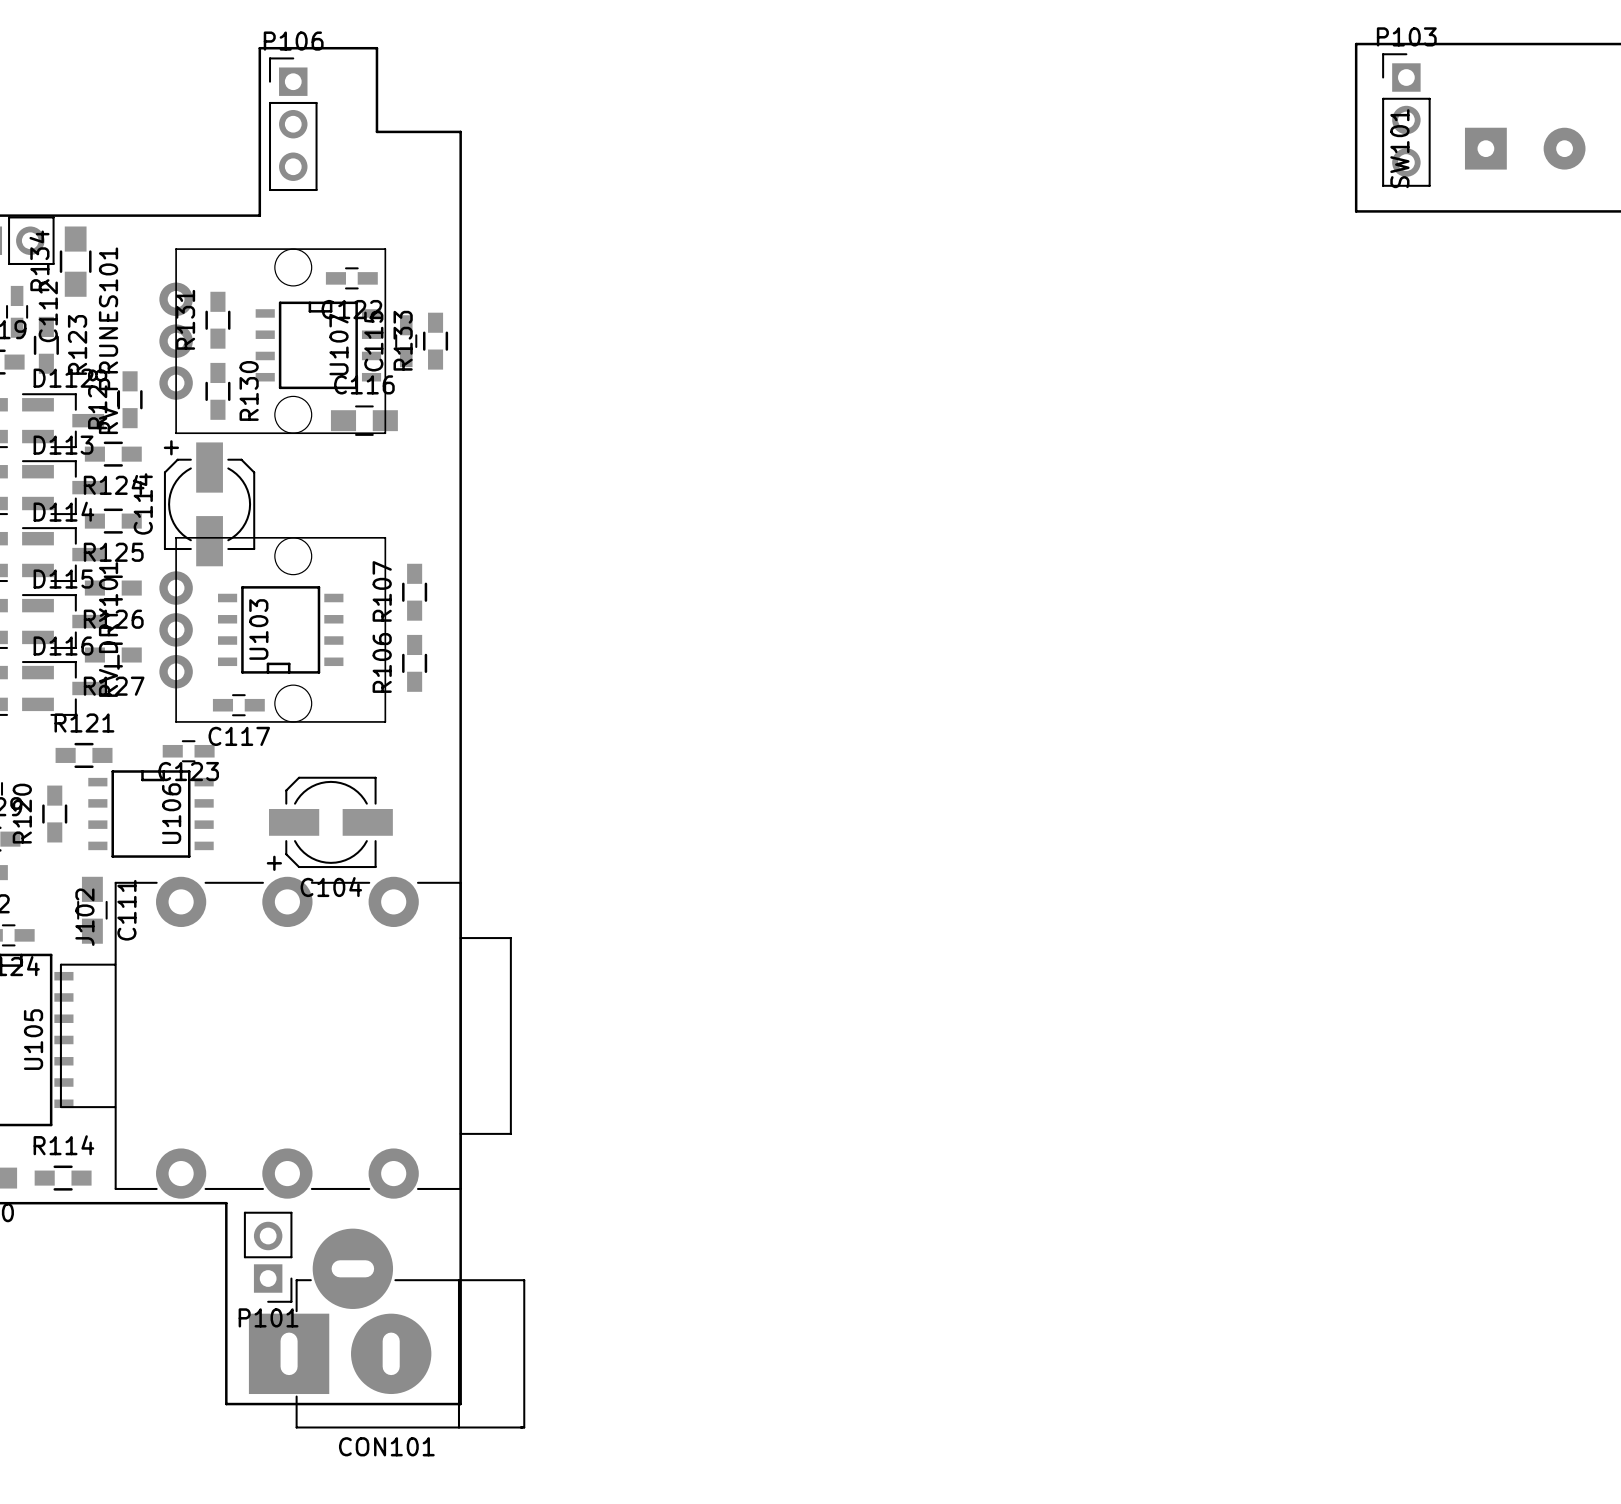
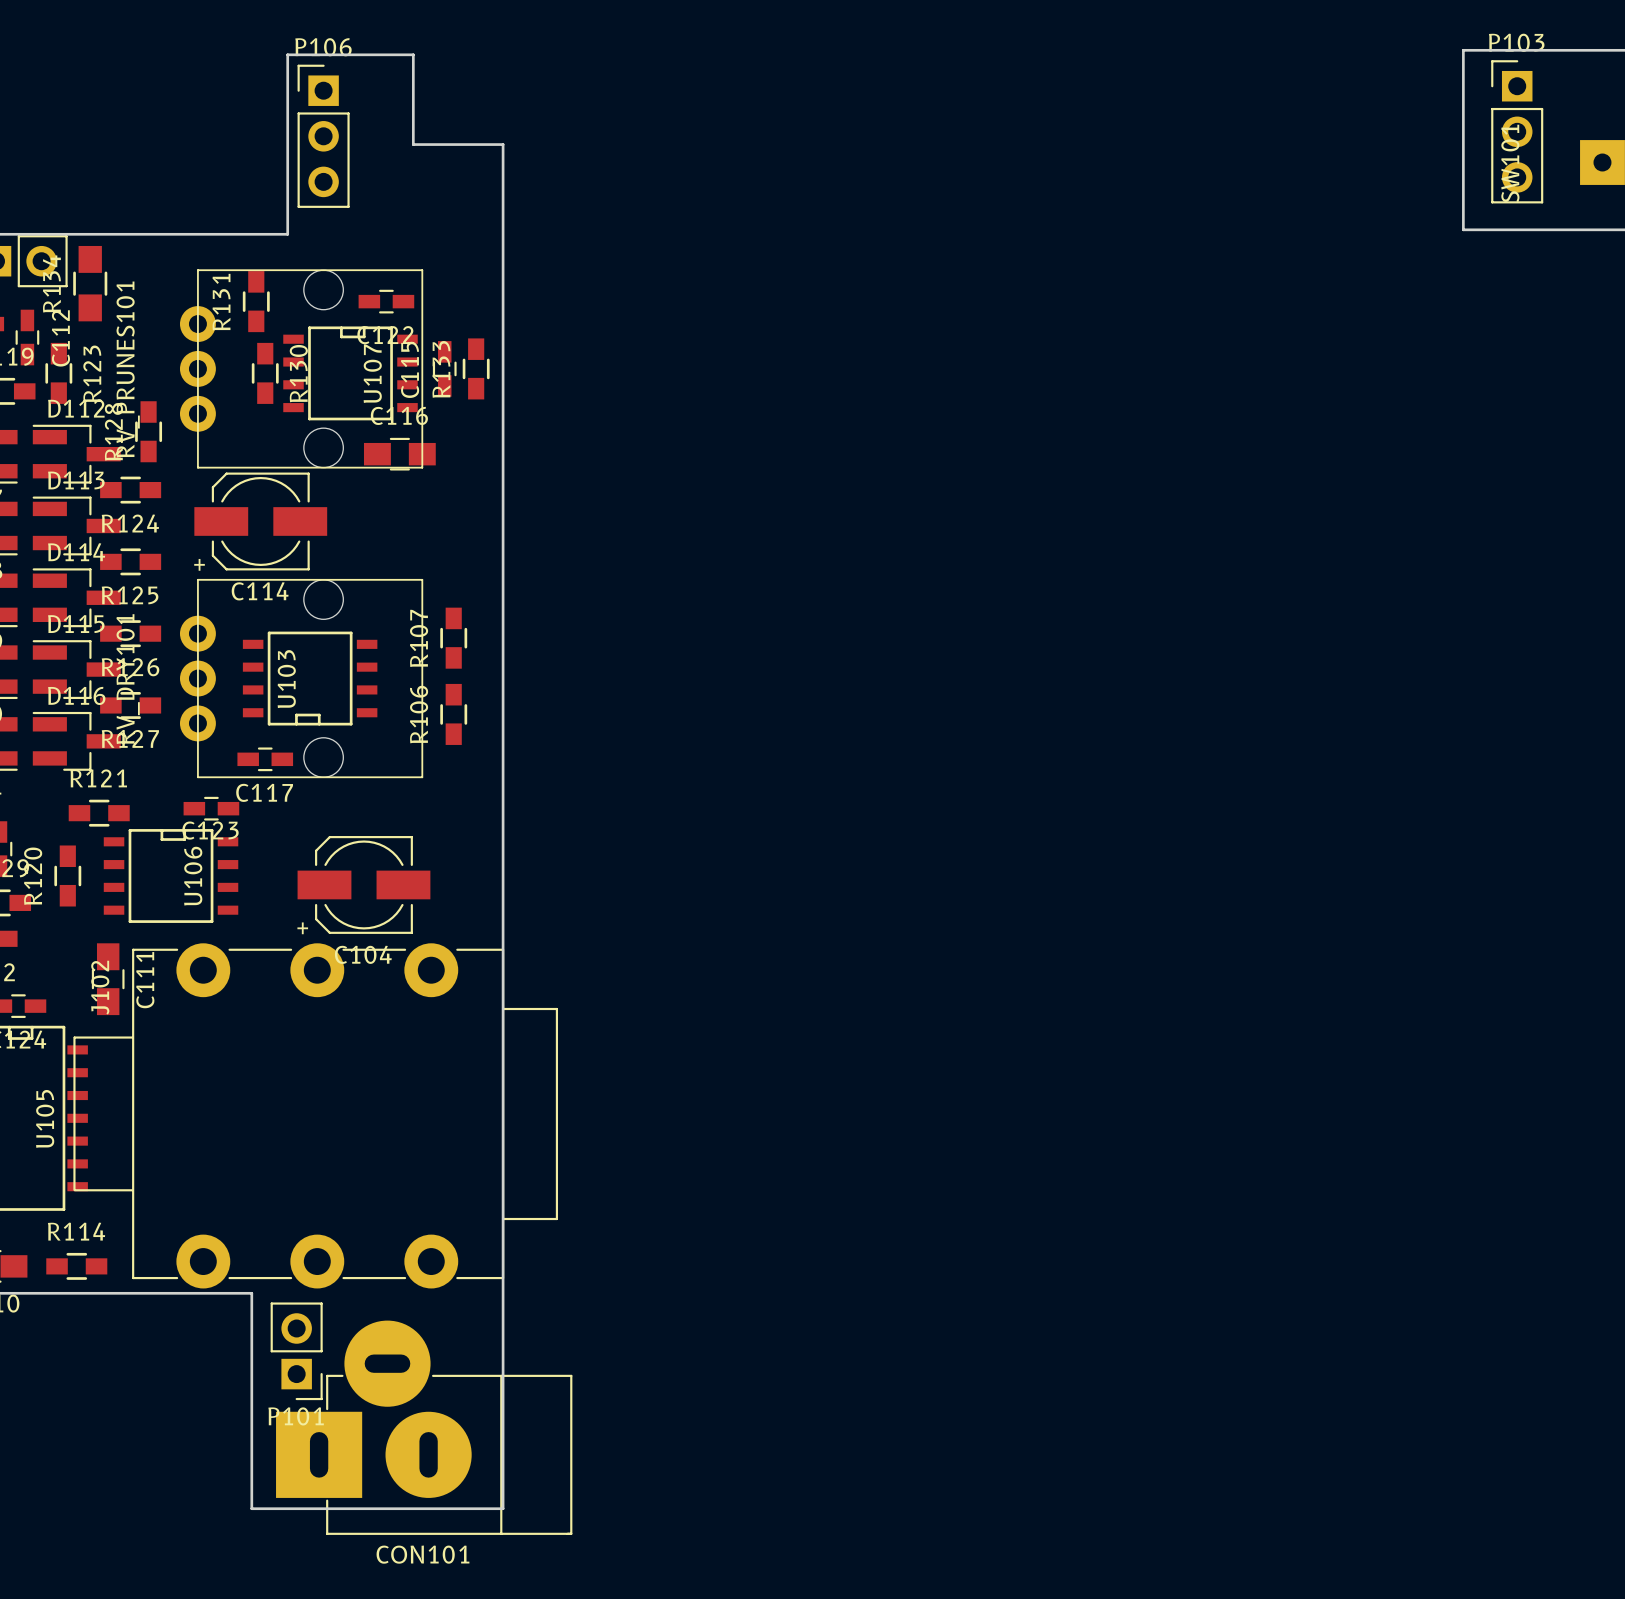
R131 position: (217, 320) -> (256, 301)
R130 position: (217, 391) -> (265, 373)
C114 rotation: 0° (209, 504) -> 90° counterclockwise (260, 521)

